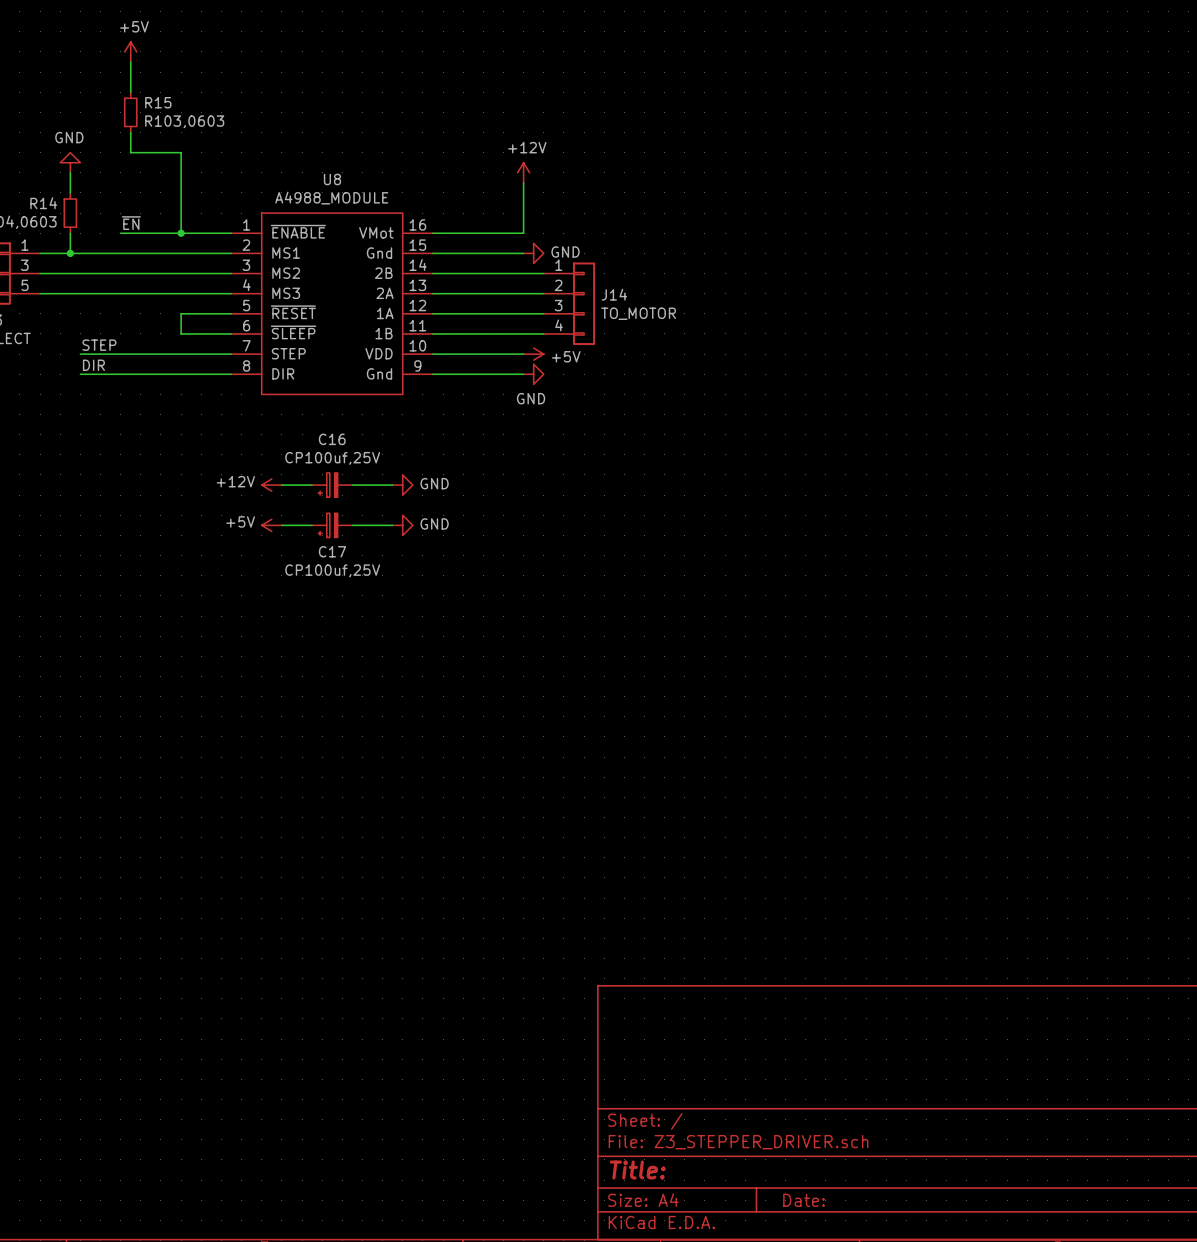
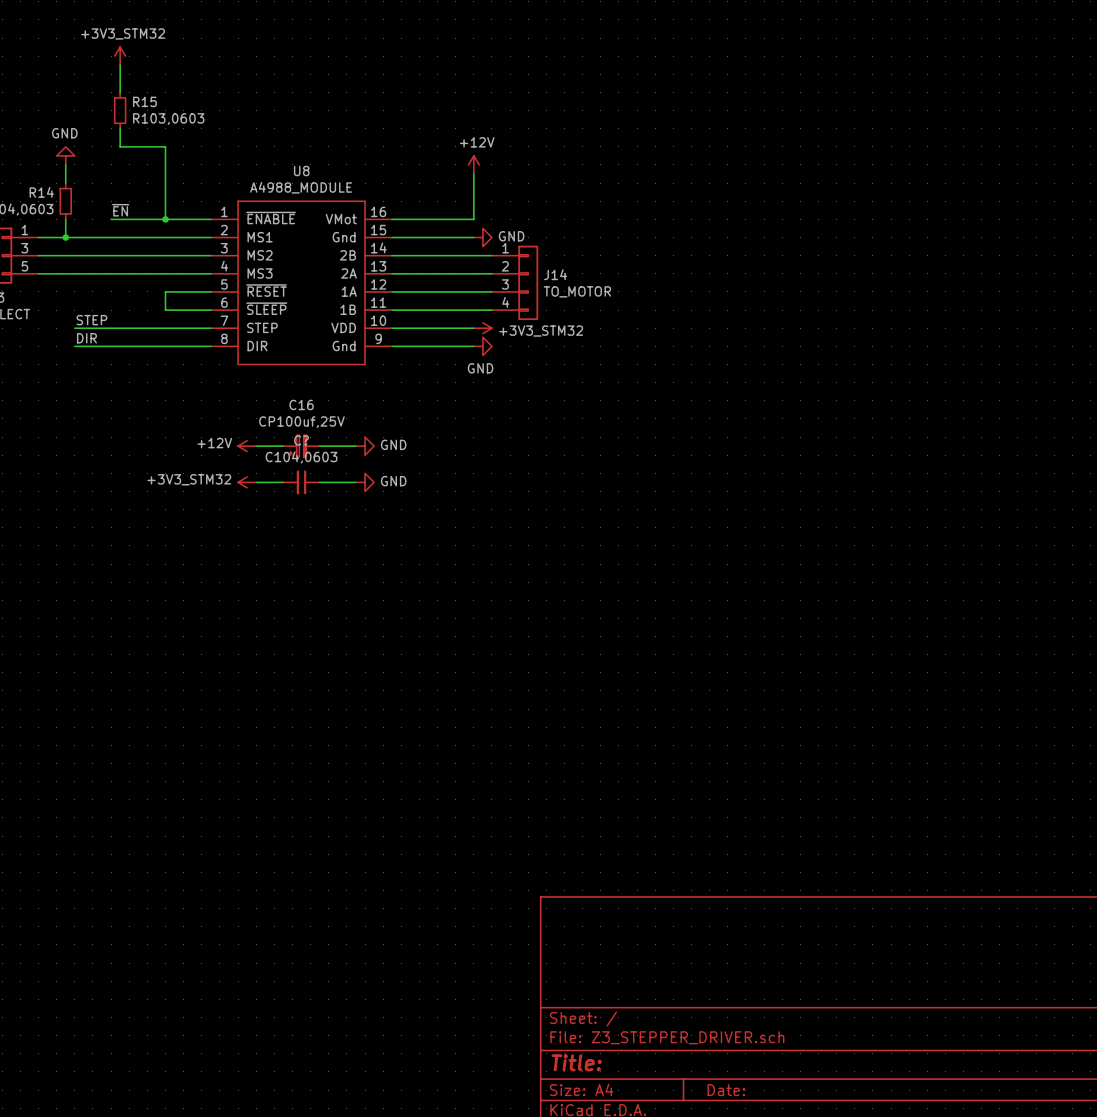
power symbol: +5V (130, 51) -> +3V3_STM32 (120, 56)
power symbol: +5V (533, 354) -> +3V3_STM32 (482, 328)
power symbol: +5V (271, 525) -> +3V3_STM32 (247, 482)
C17: CP100uf,25V (332, 525) -> none
C?: none -> C104,0603 (301, 482)

